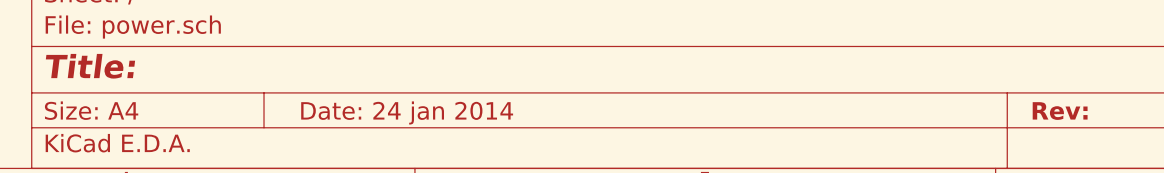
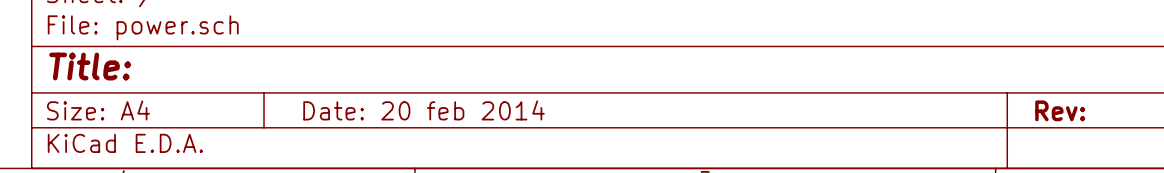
title block: Date: 24 jan 2014 (407, 112) -> Date: 20 feb 2014 (424, 110)

